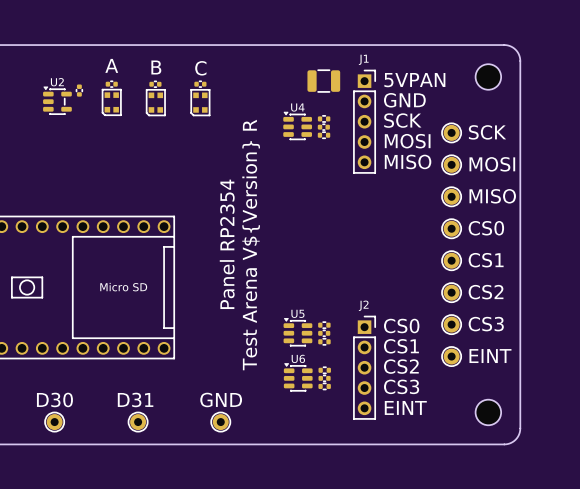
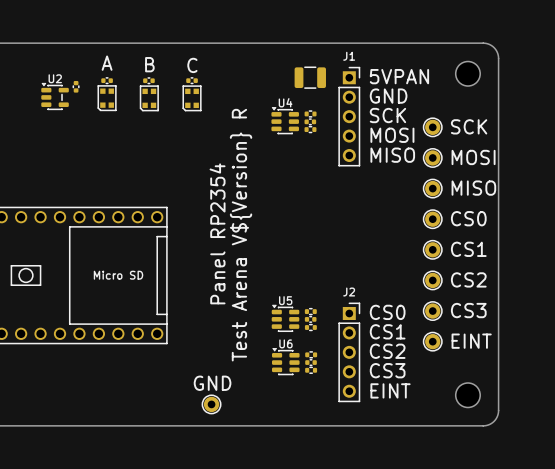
text: D30 (54, 399) -> none
text: D31 (135, 399) -> none
part: (54, 422) -> none
part: (138, 422) -> none

